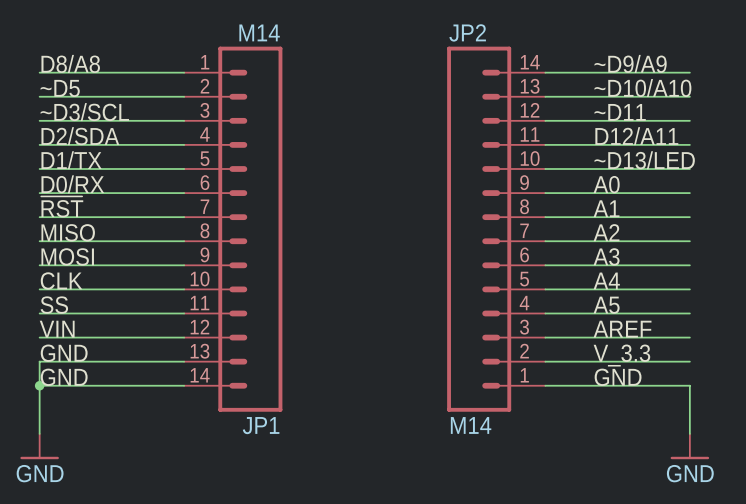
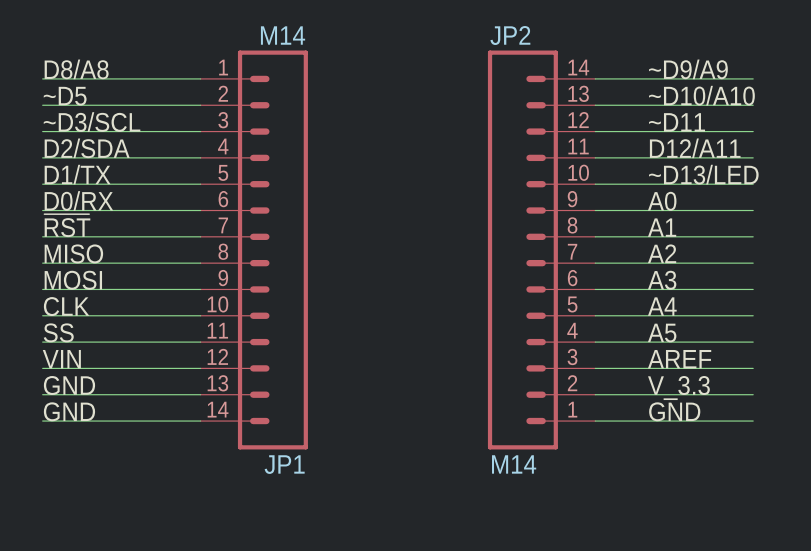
wire: (39, 361) (39, 433) -> none
junction: (39, 385) -> none
wire: (689, 385) (689, 433) -> none
power symbol: GND (39, 446) -> none
power symbol: GND (689, 446) -> none

